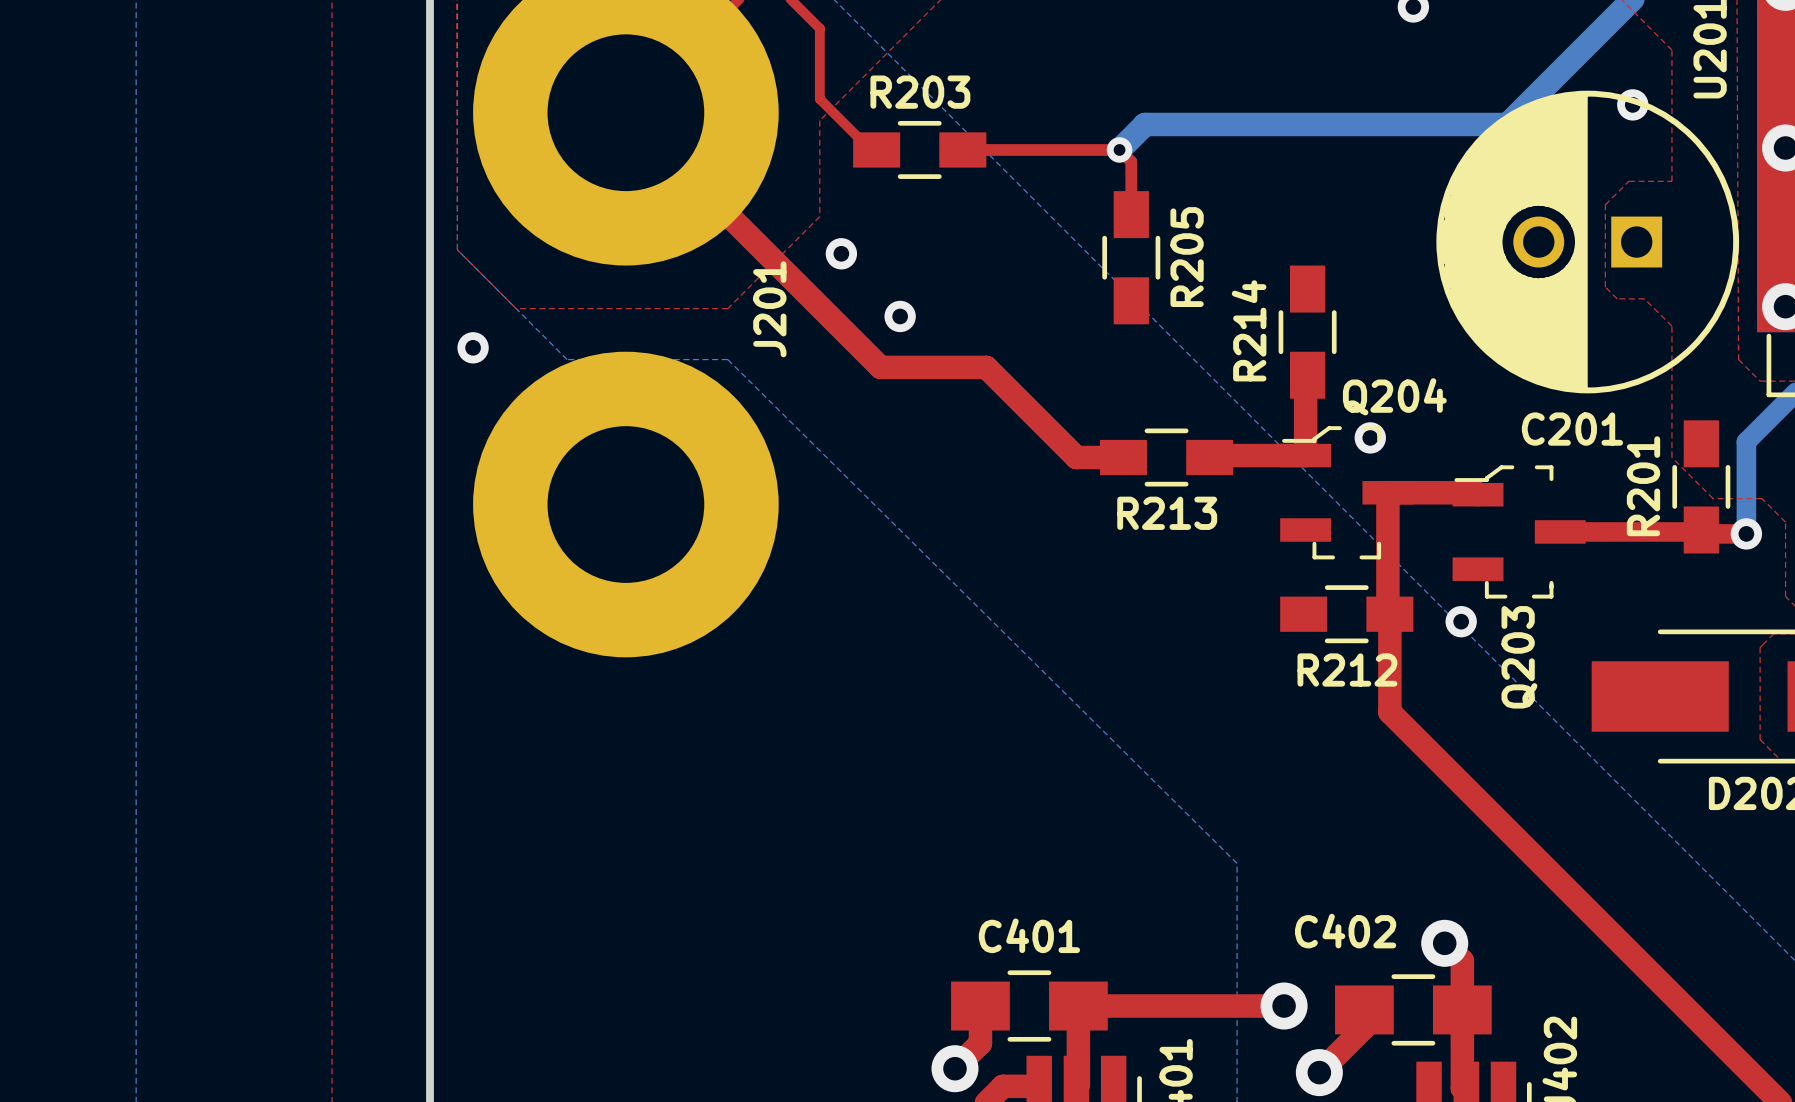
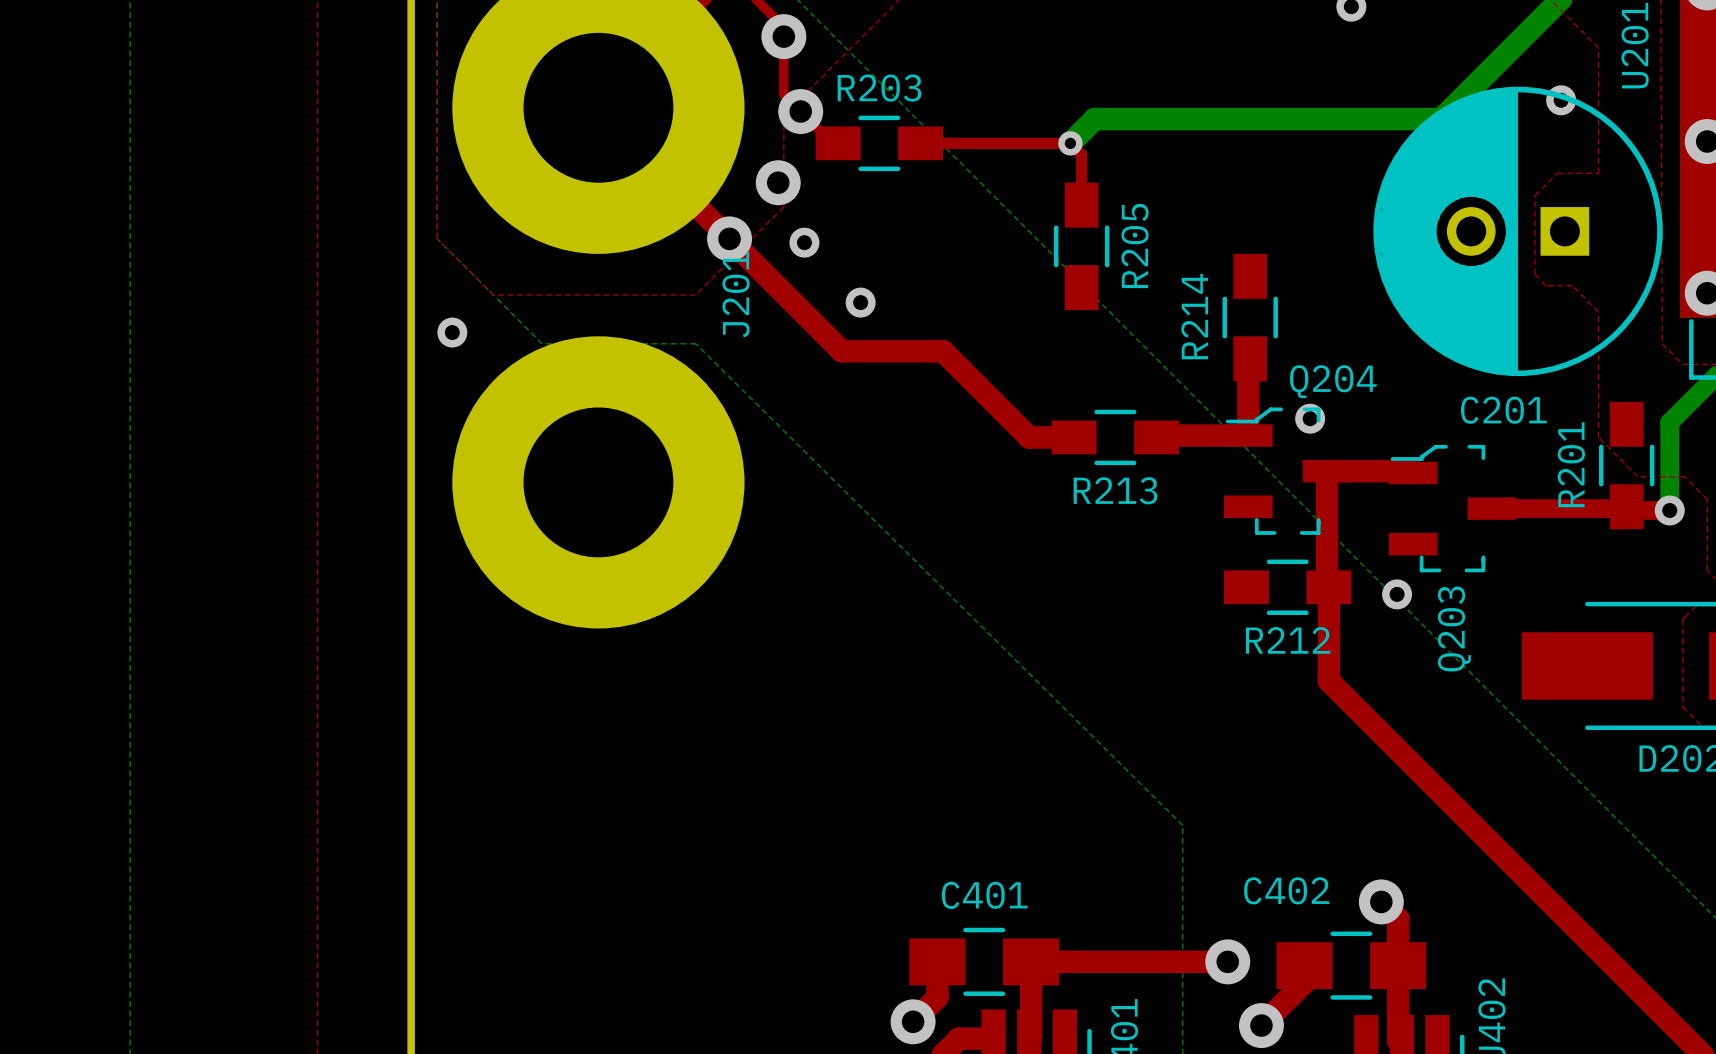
via: none -> (783, 36)
via: none -> (800, 111)
via: none -> (778, 182)
via: none -> (729, 238)

